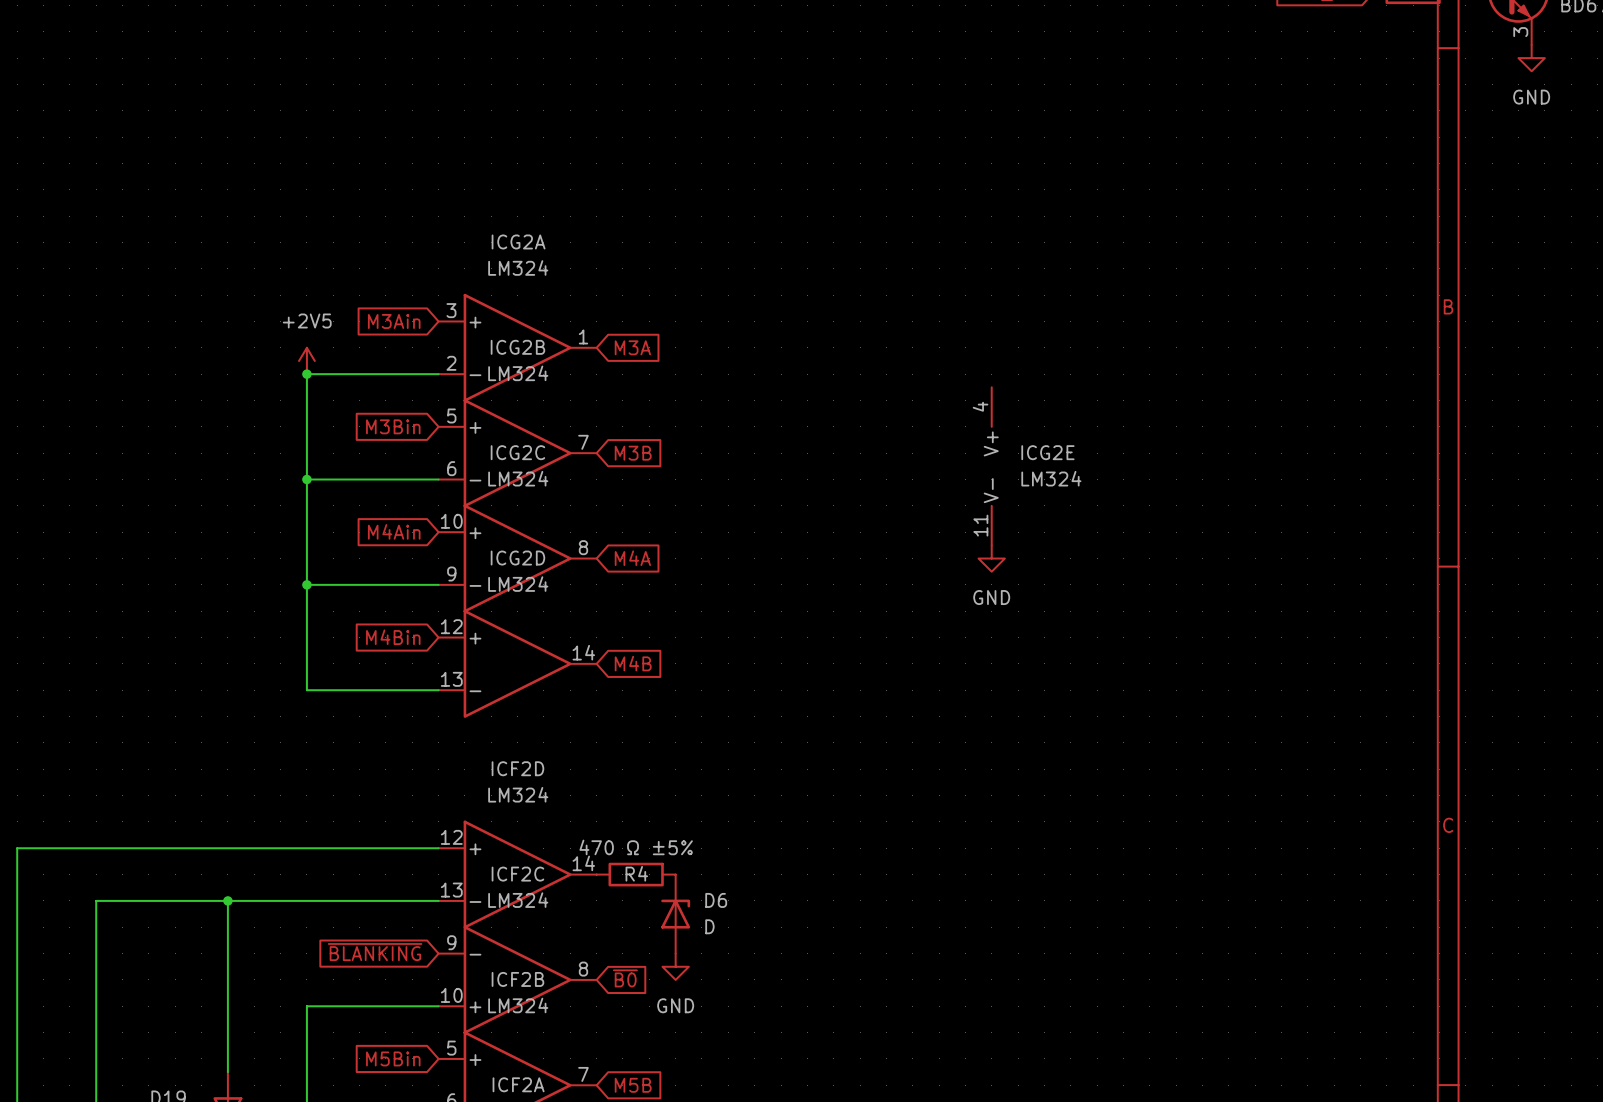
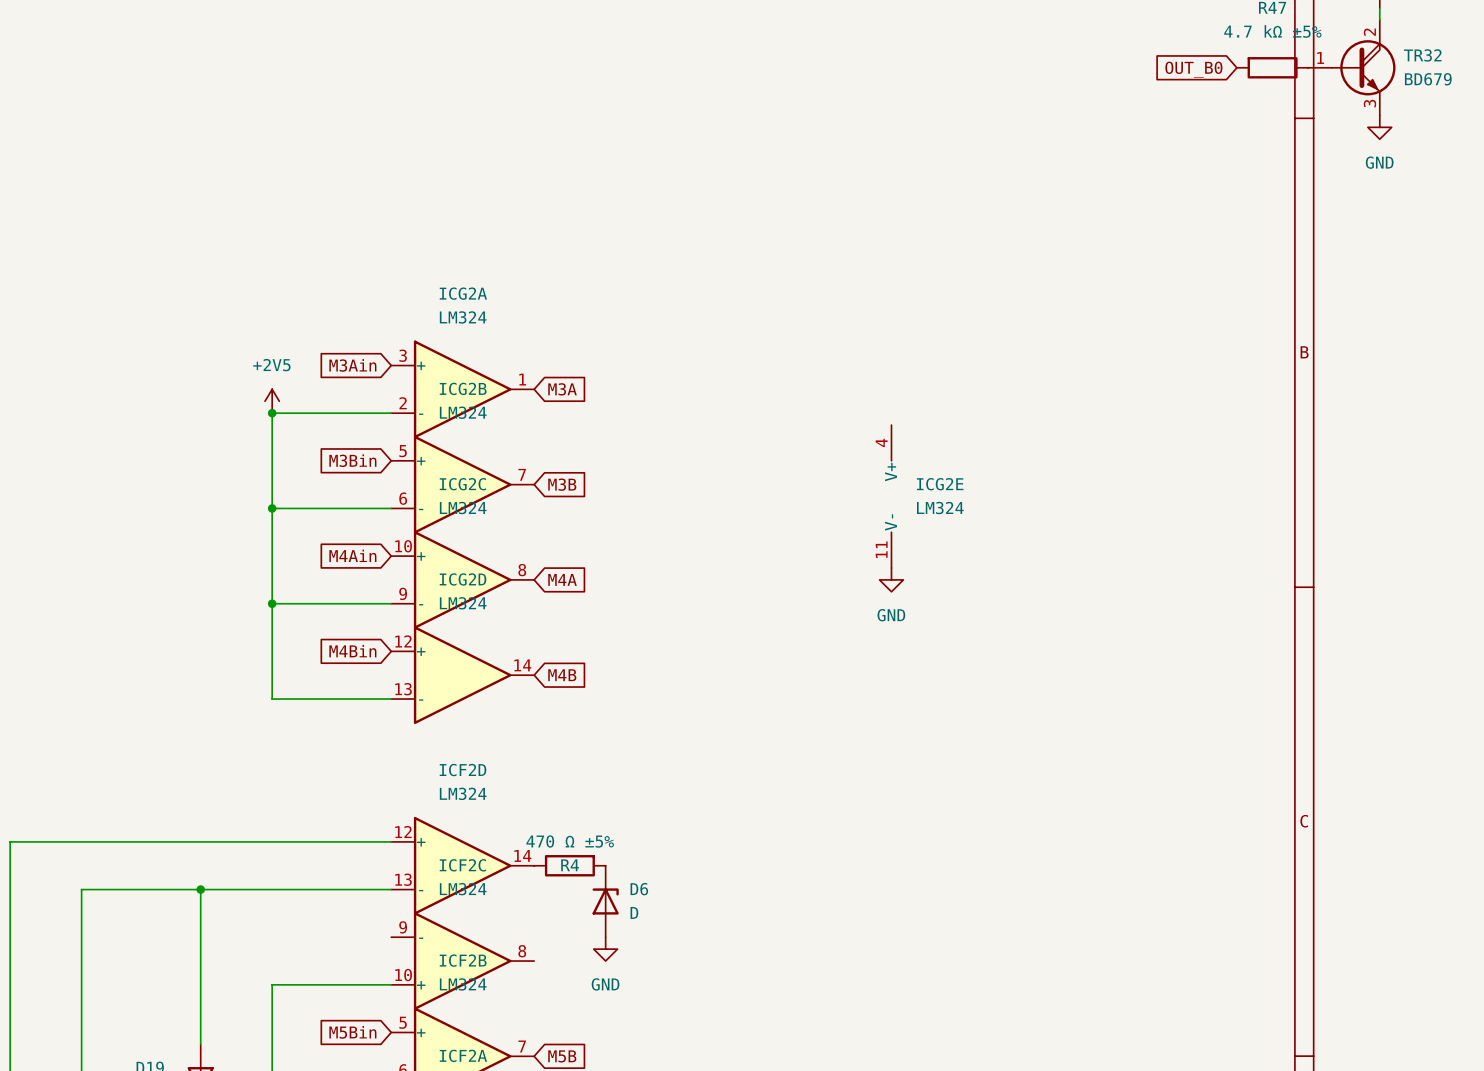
global label: ~{BLANKING} (375, 952) -> none
global label: ~{B0} (625, 978) -> none

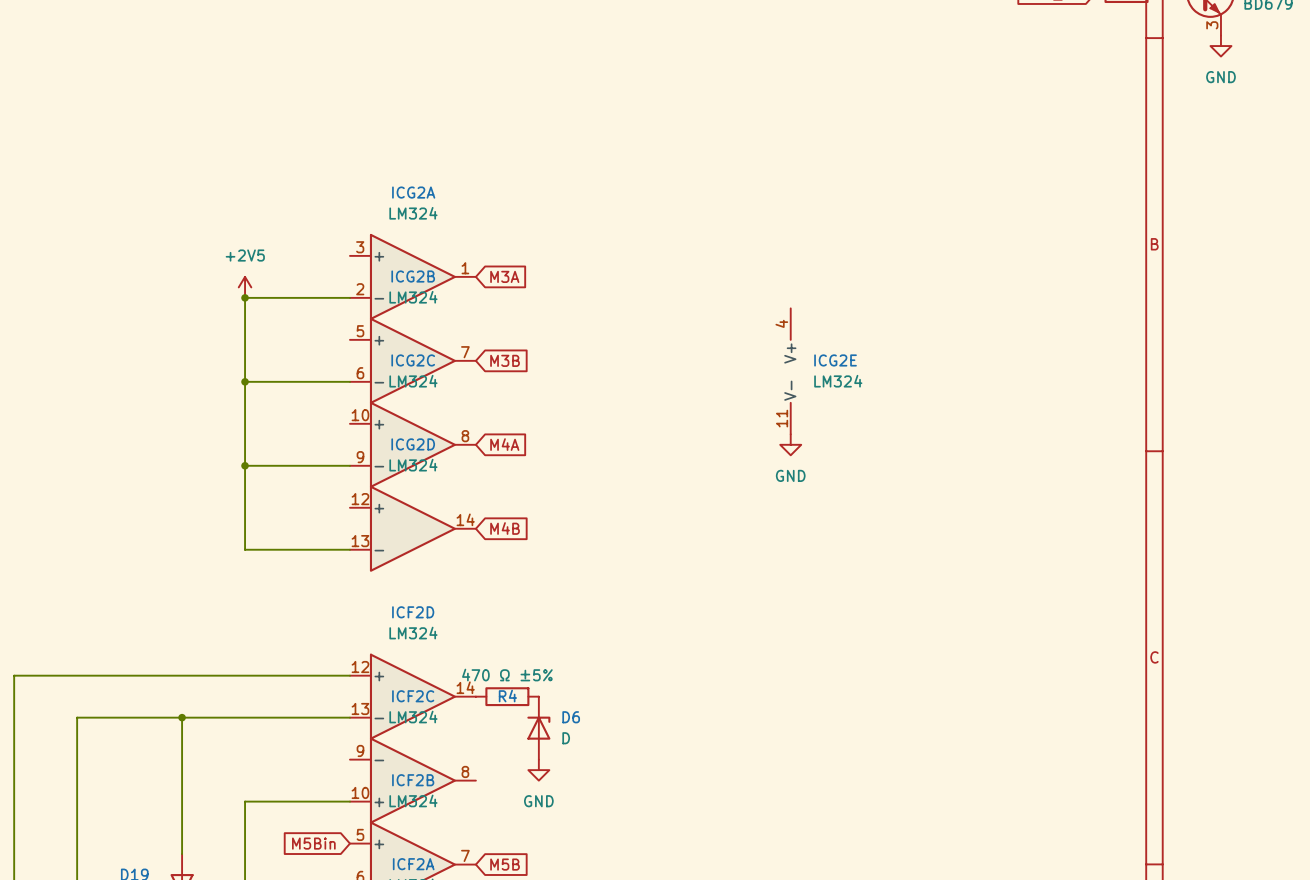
global label: M3Ain (352, 365) -> none
global label: M3Bin (352, 460) -> none
global label: M4Ain (352, 555) -> none
global label: M4Bin (352, 651) -> none

